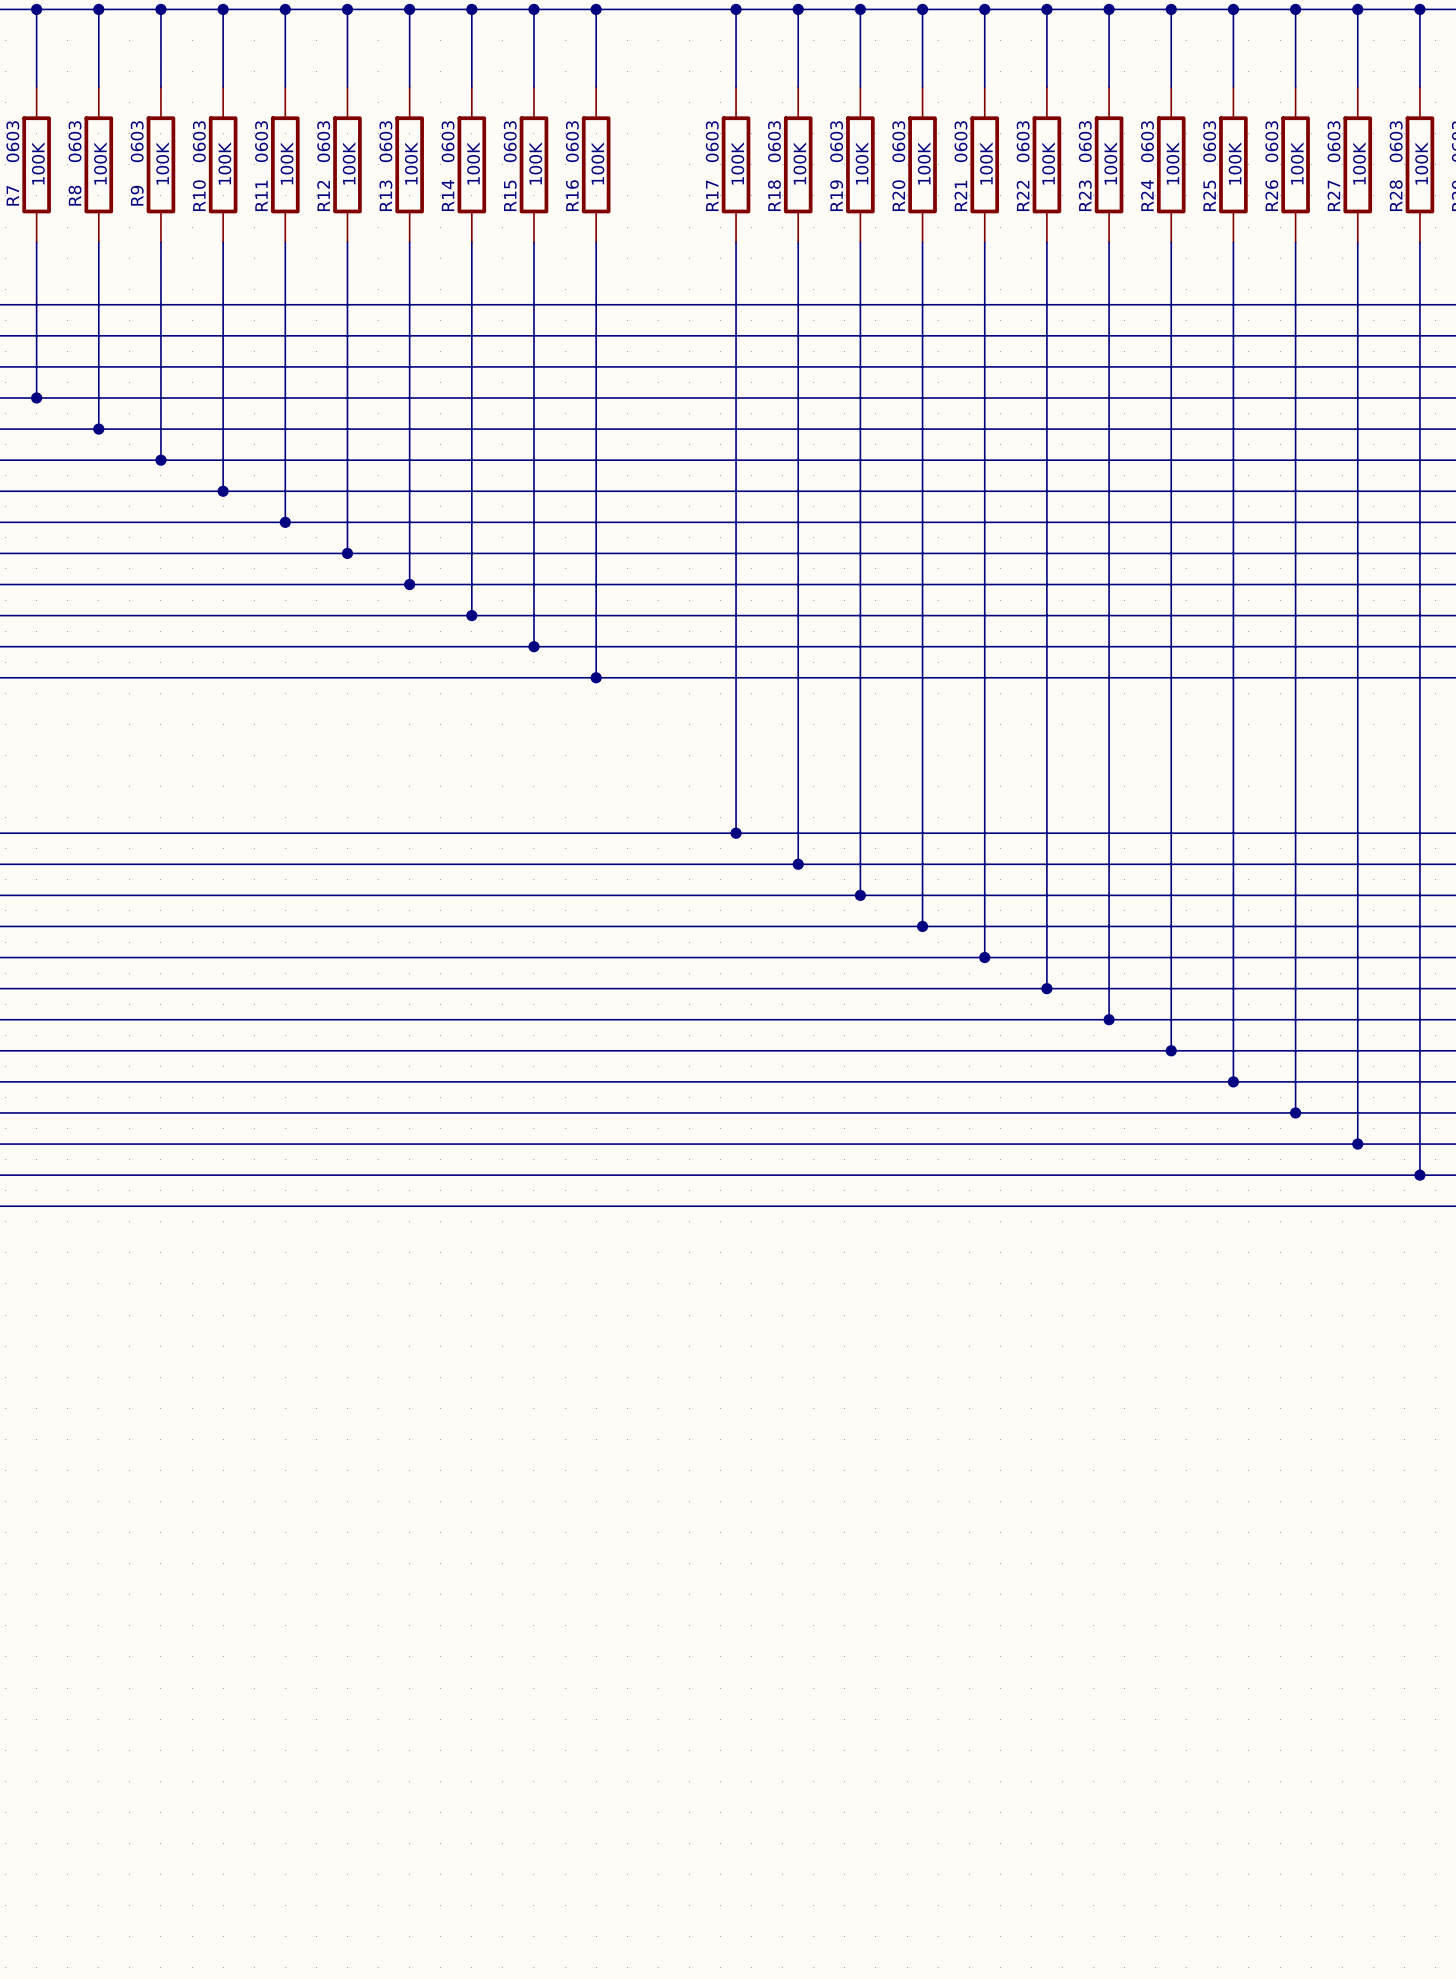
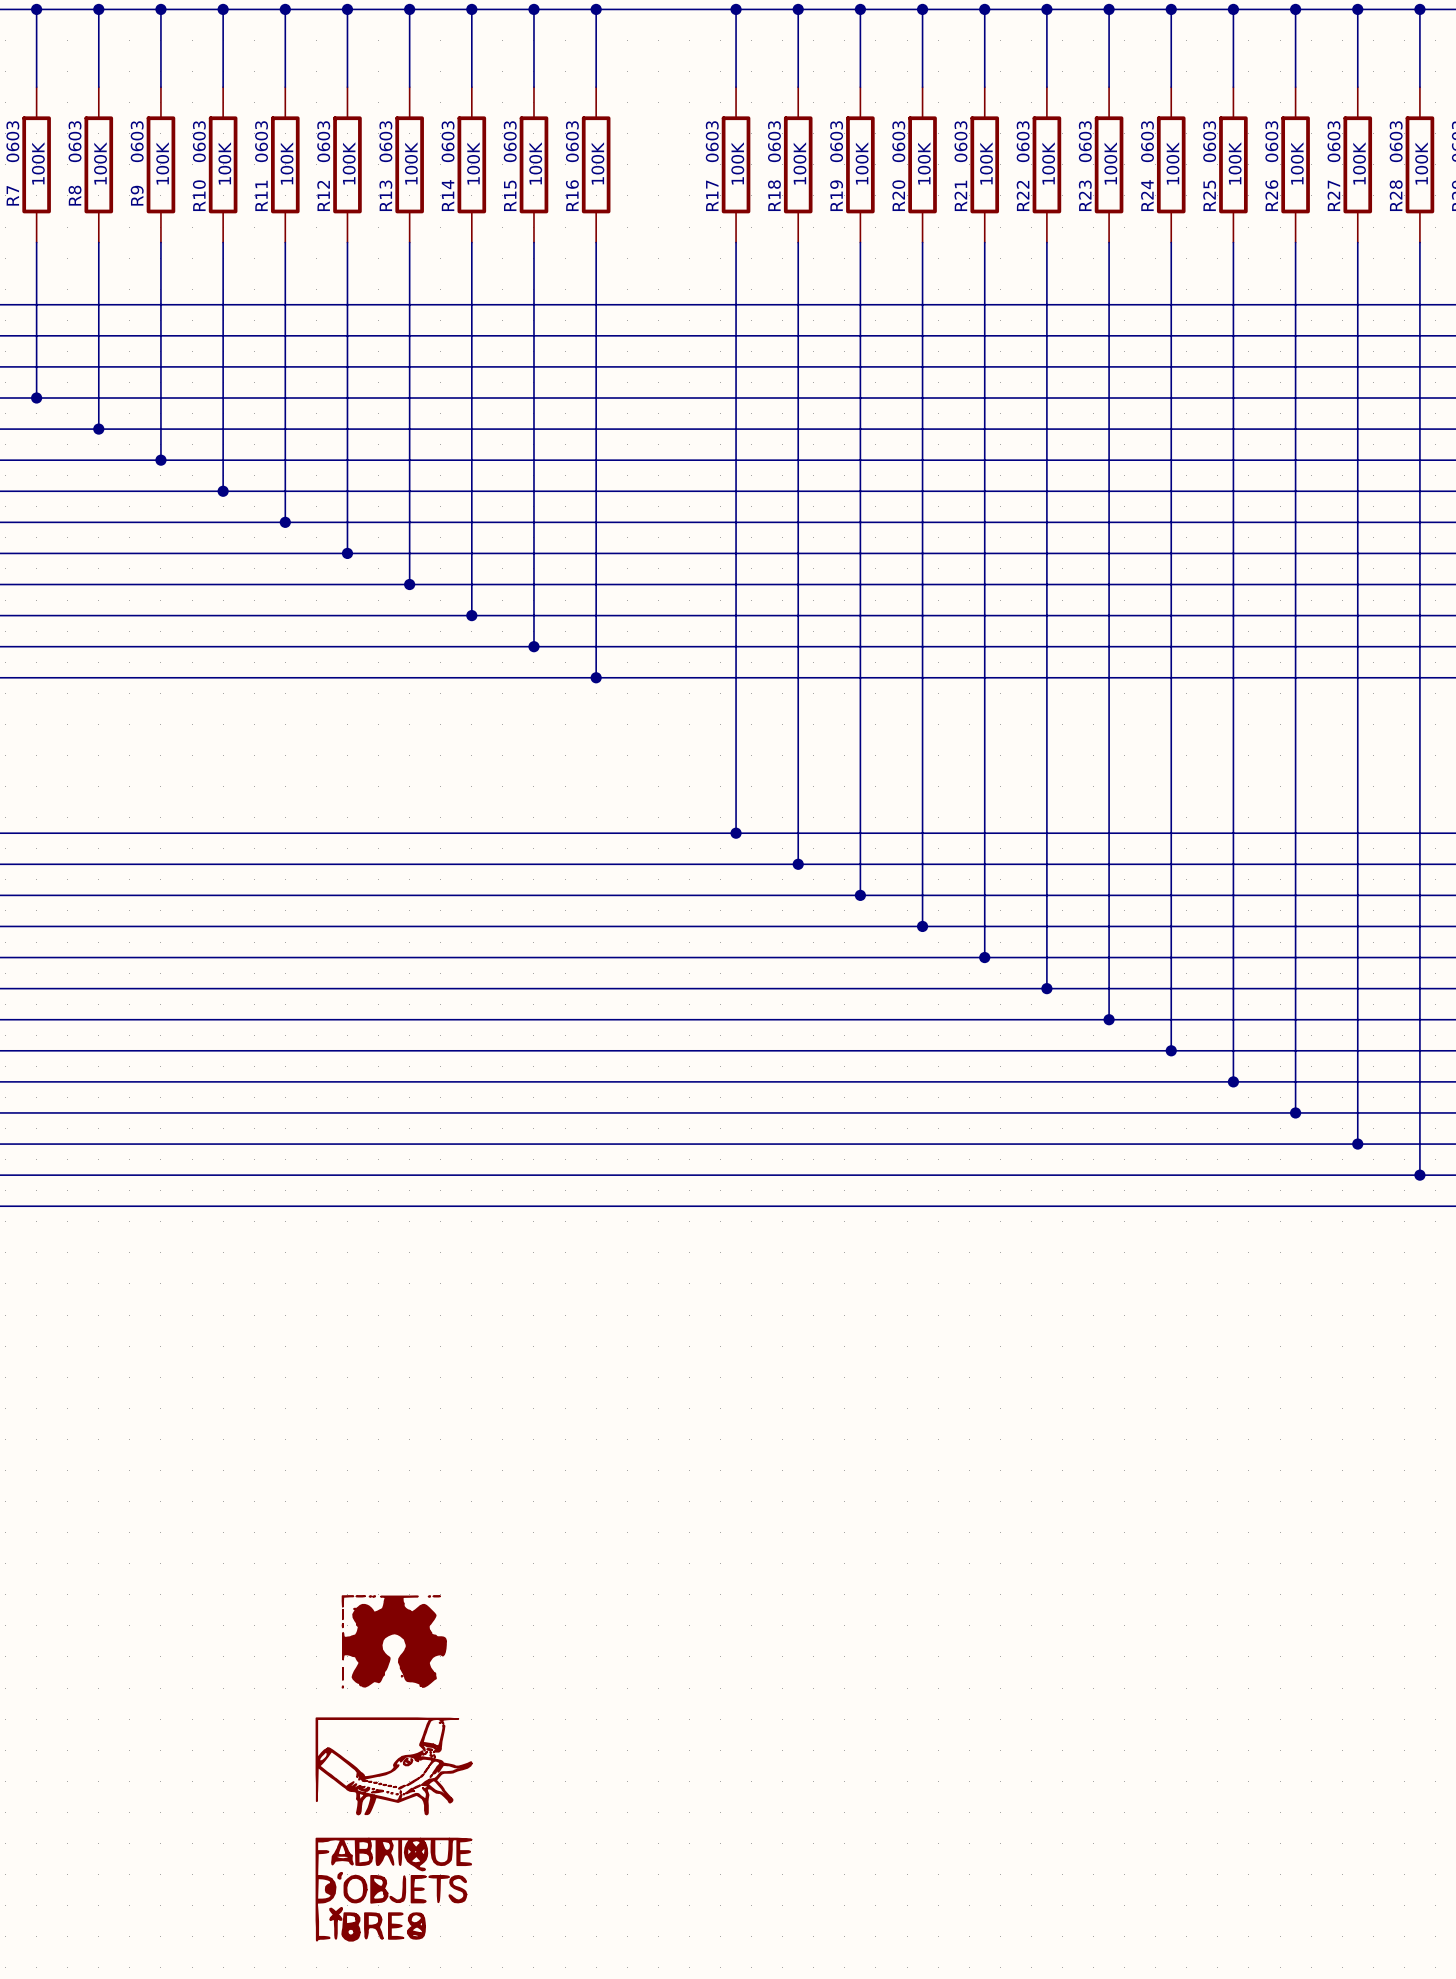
part: none -> (394, 1641)
part: none -> (394, 1766)
part: none -> (393, 1889)

